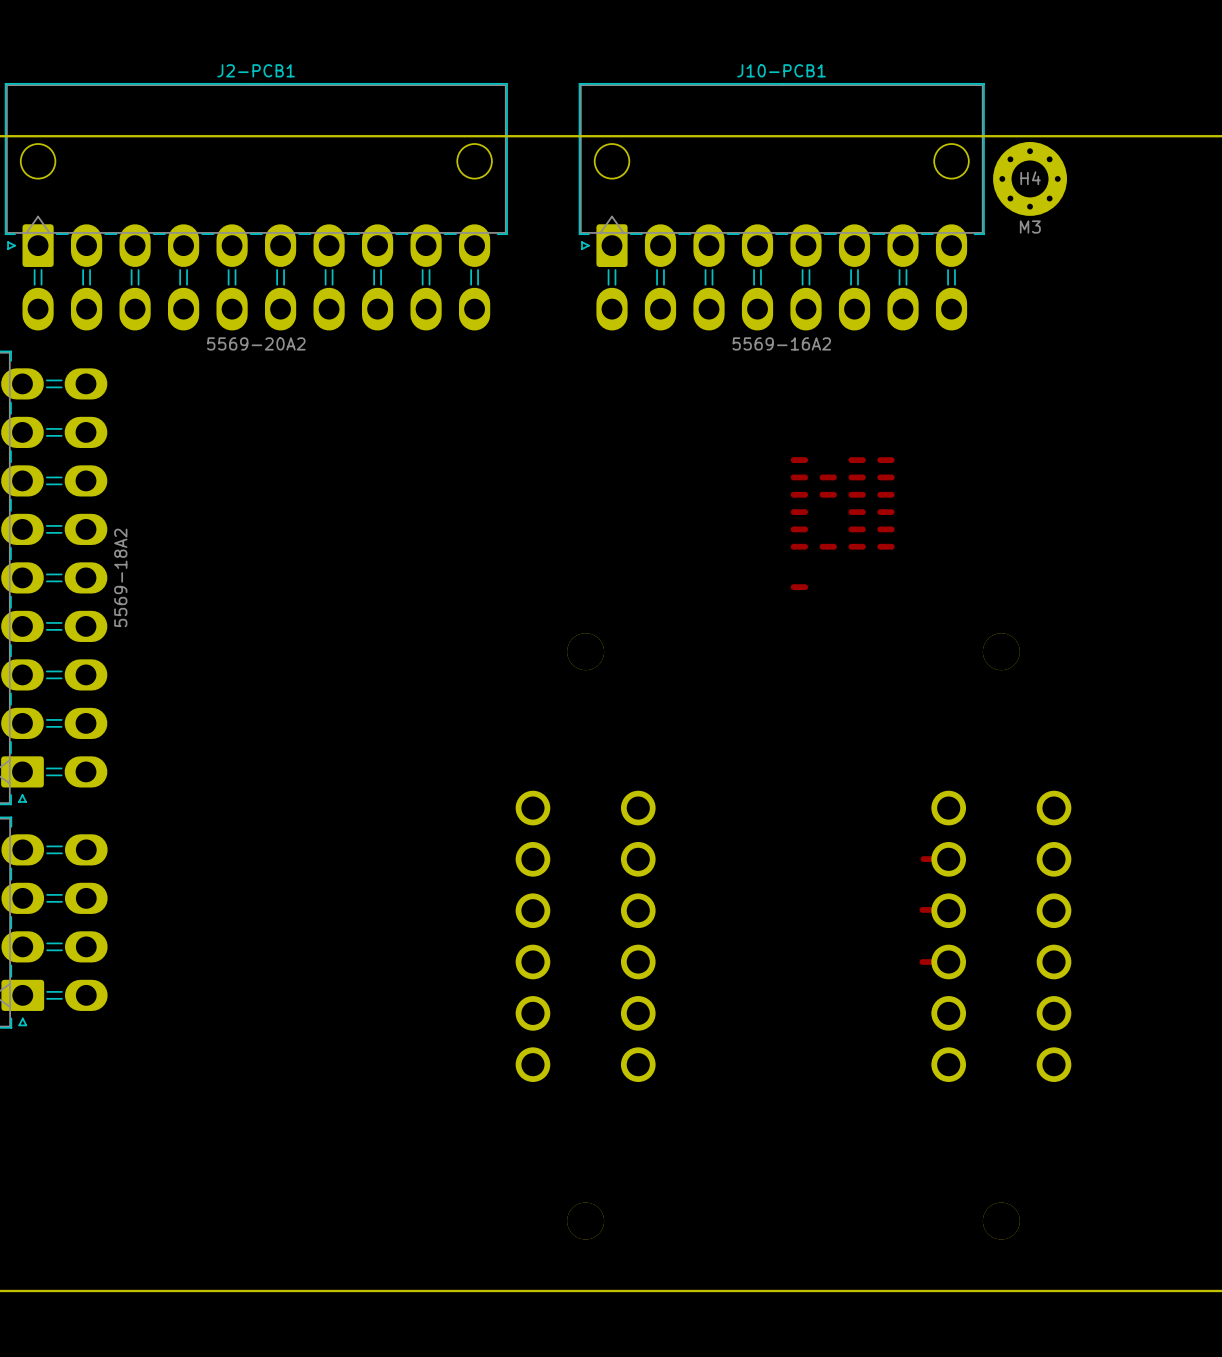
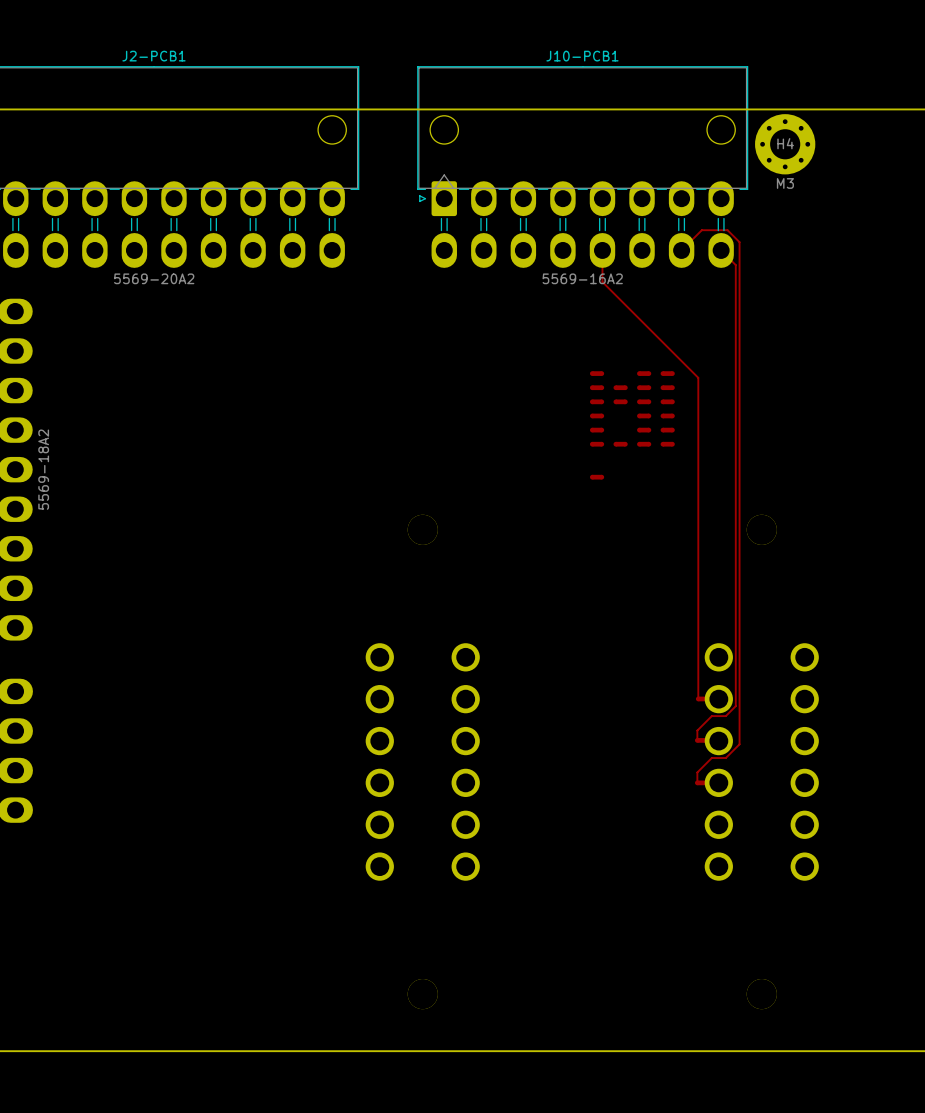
top track: none -> (602, 250) (602, 282) (698, 377) (698, 698)
top track: none -> (681, 250) (701, 230) (727, 230) (739, 242) (739, 744) (725, 758) (711, 758) (697, 772) (697, 782)
top track: none -> (721, 250) (735, 265) (735, 706) (725, 716) (711, 716) (697, 730) (697, 740)

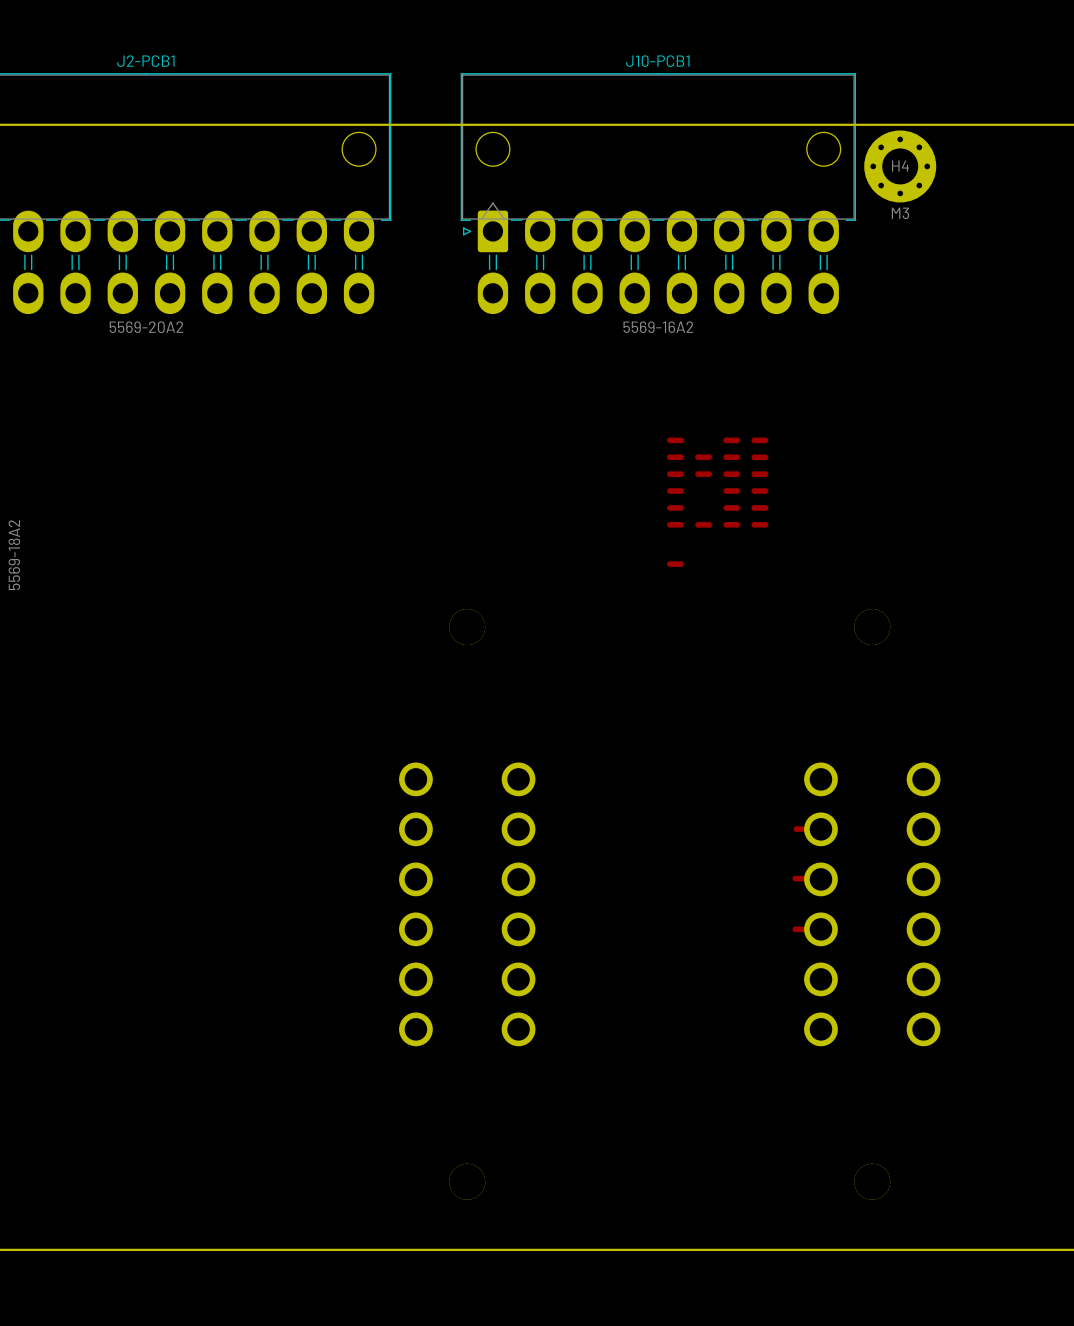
top track: (602, 250) (602, 282) (698, 377) (698, 698) -> none
top track: (681, 250) (701, 230) (727, 230) (739, 242) (739, 744) (725, 758) (711, 758) (697, 772) (697, 782) -> none
top track: (721, 250) (735, 265) (735, 706) (725, 716) (711, 716) (697, 730) (697, 740) -> none

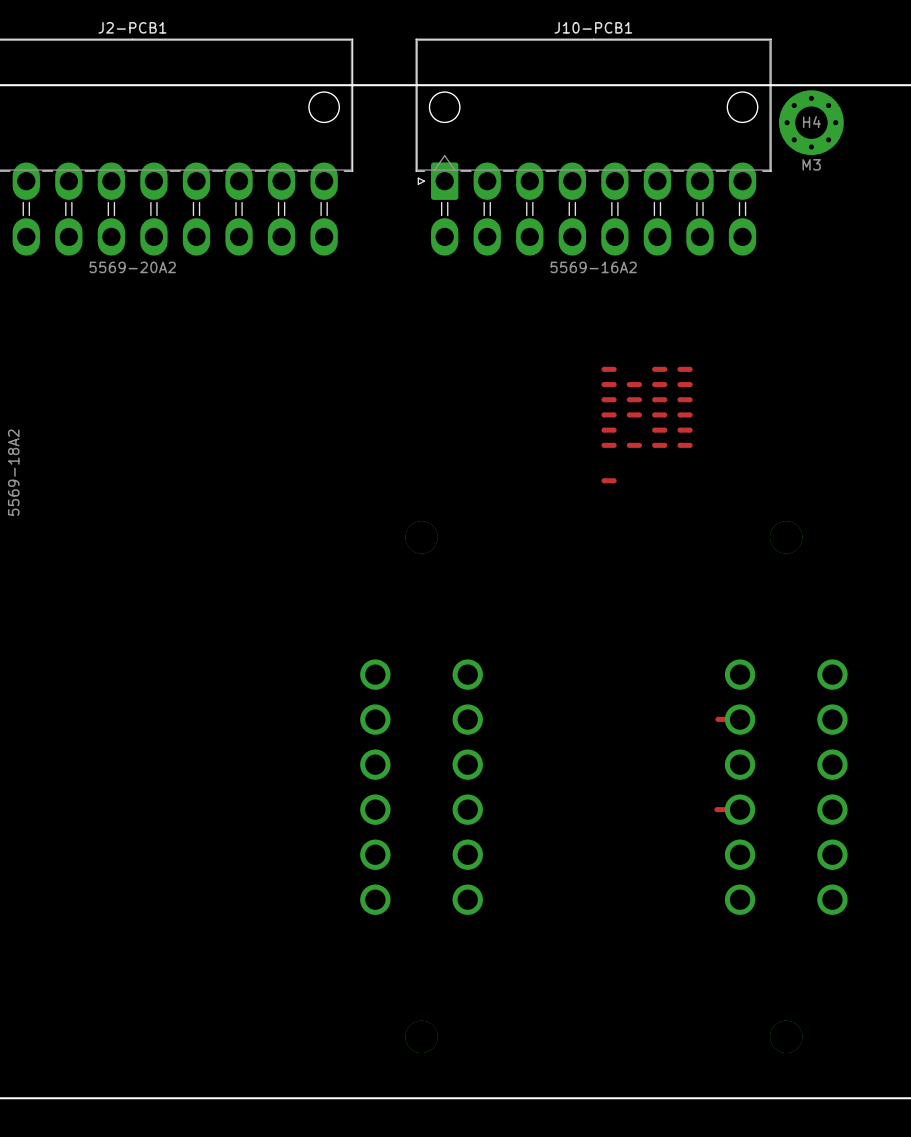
part: none -> (634, 414)
part: (800, 878) -> none

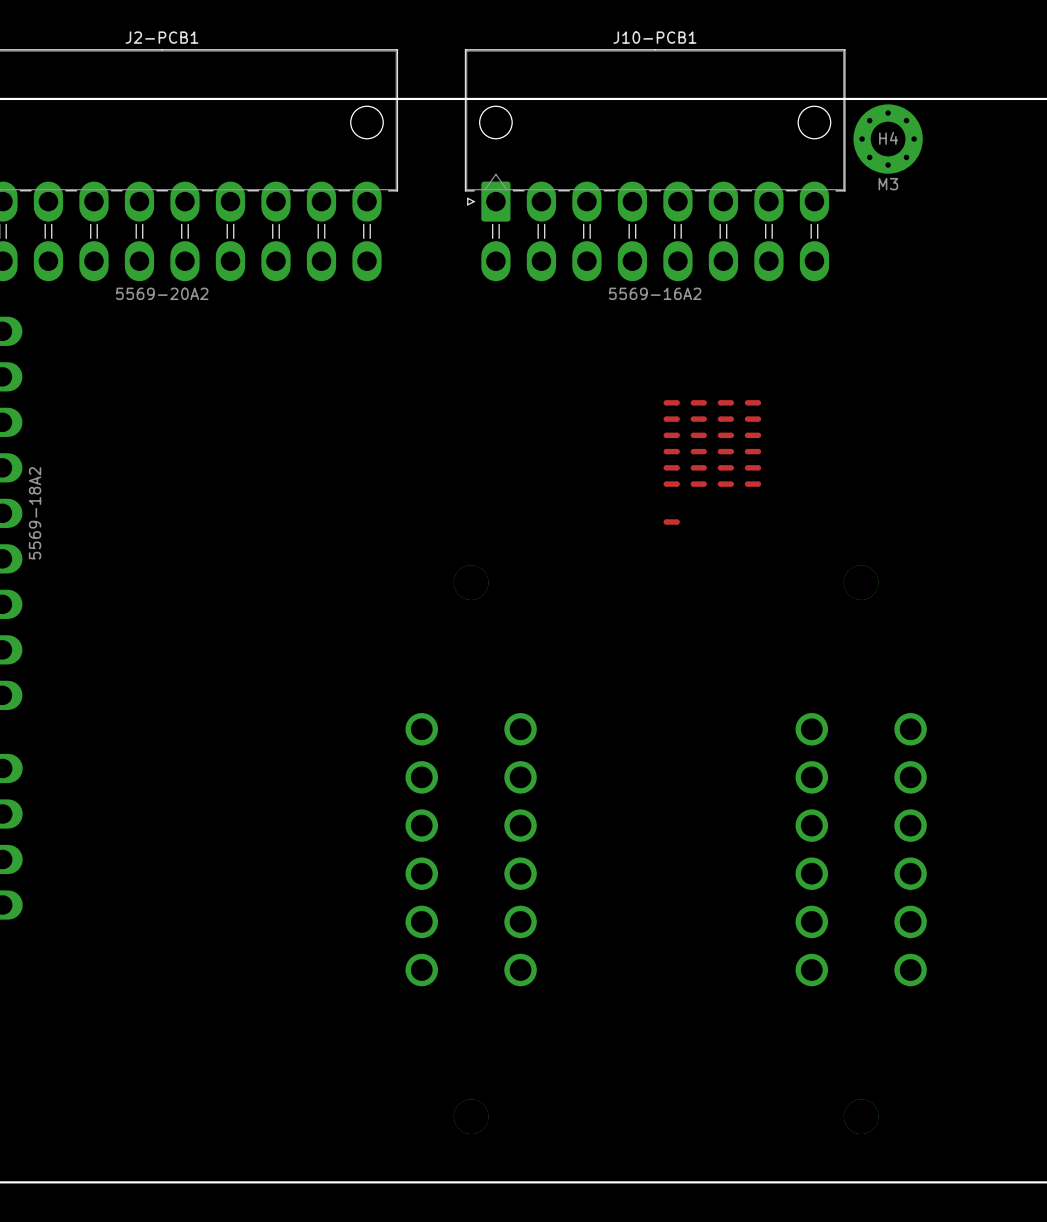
part: none -> (698, 402)
part: none -> (698, 467)
part: (723, 719) -> none
part: (722, 809) -> none

